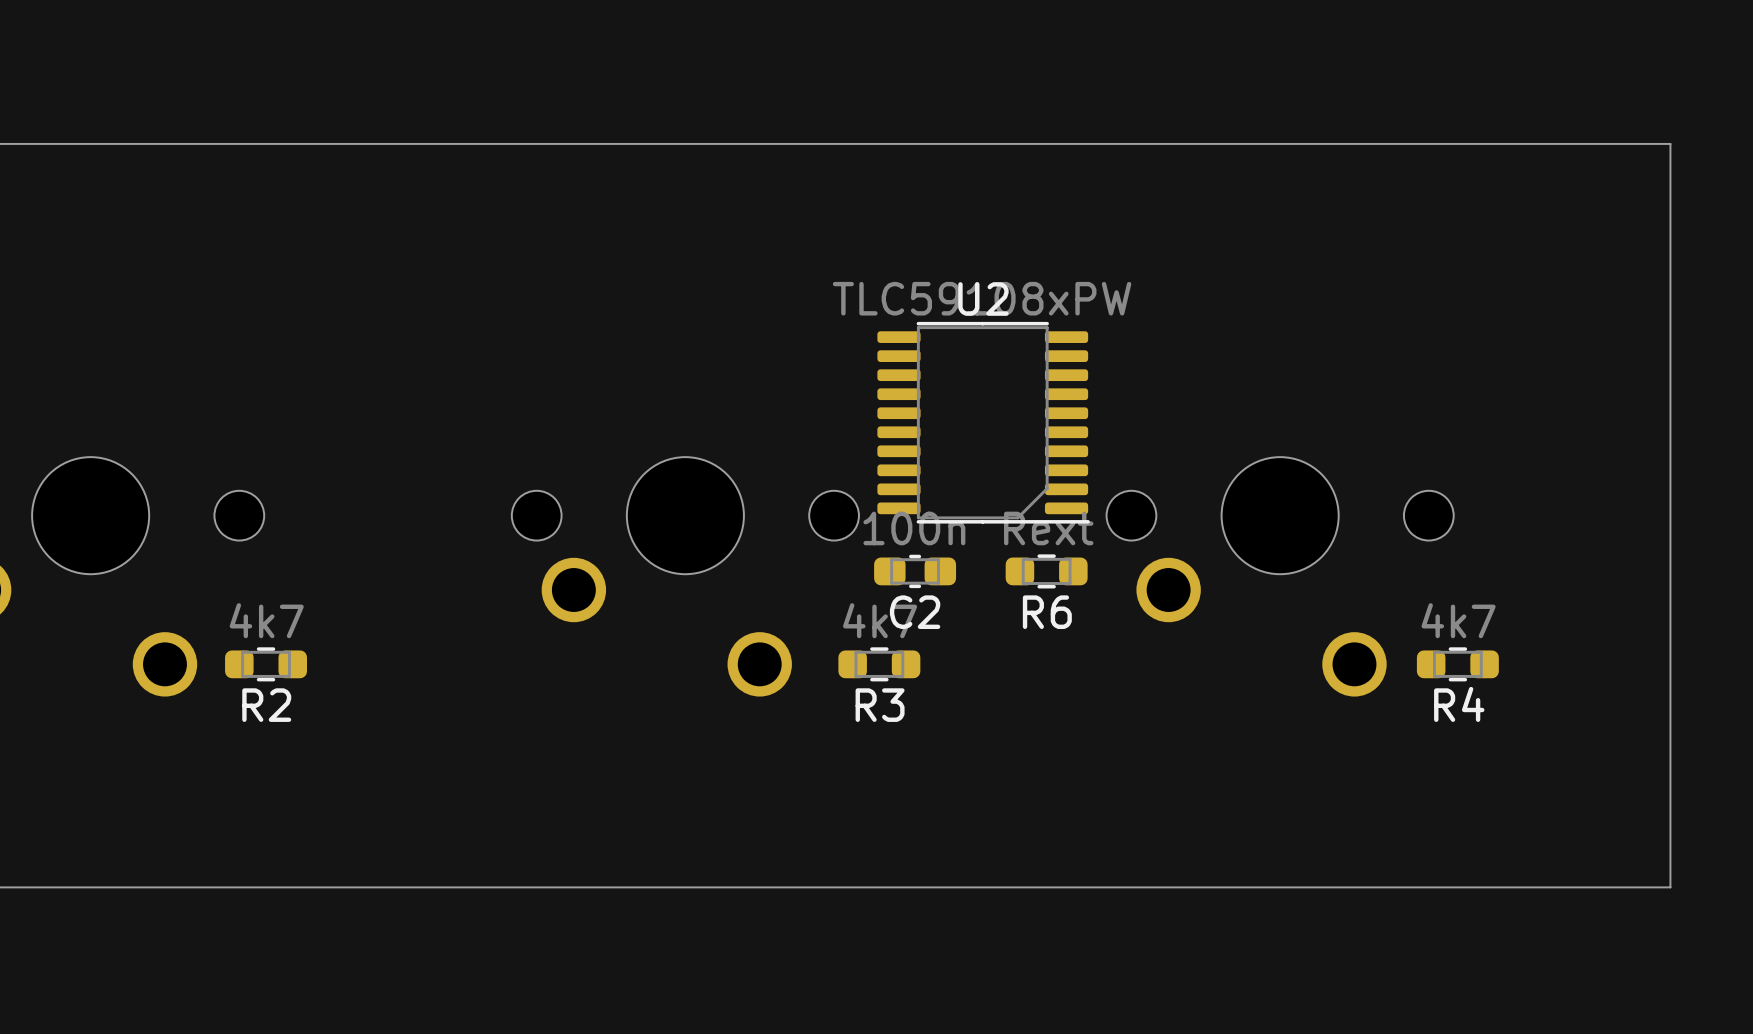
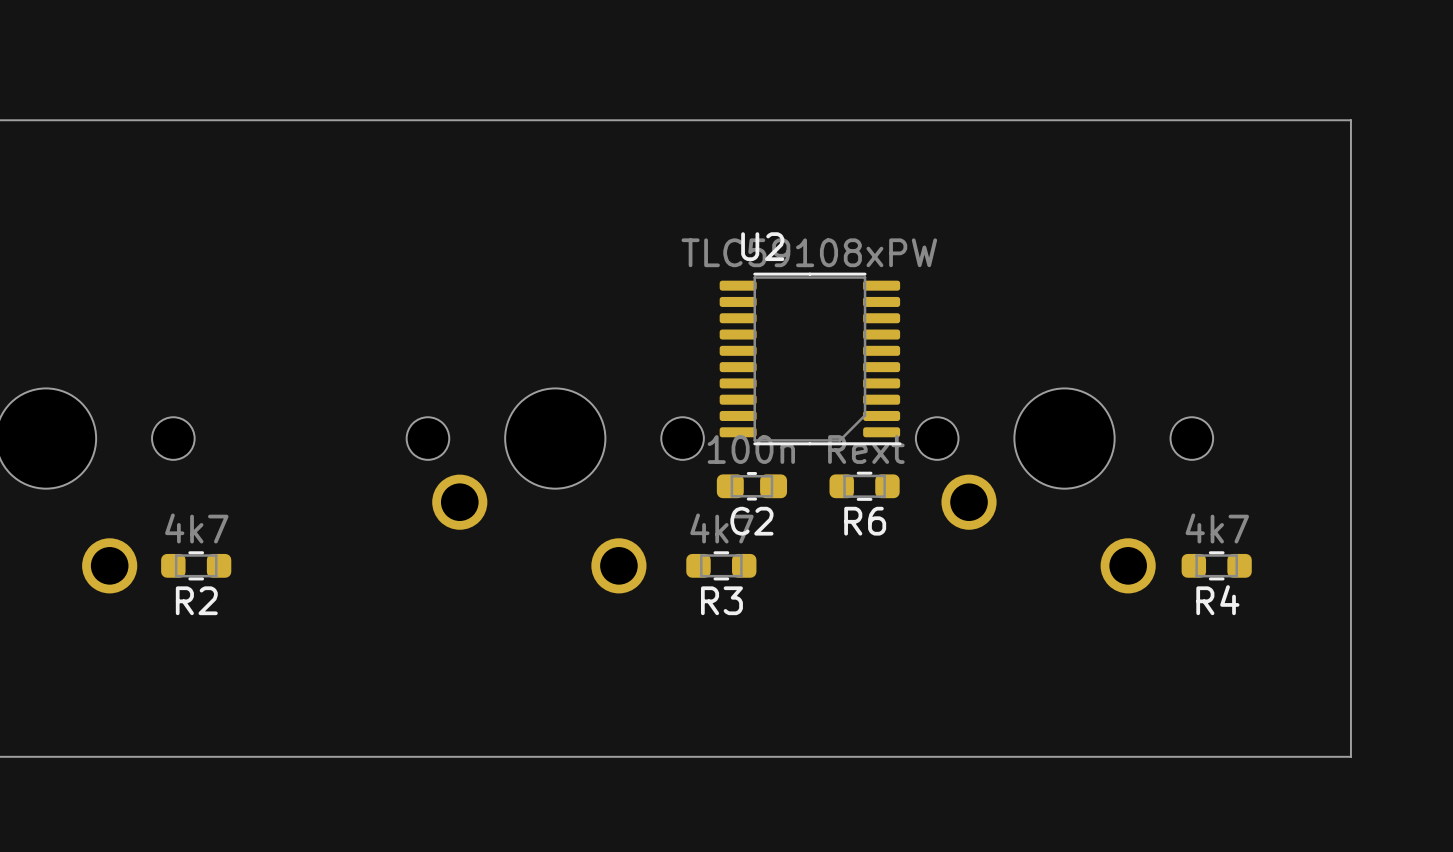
board edge: (1614, 143) (1670, 143) (1670, 887) (1614, 887) -> (1350, 120) (1350, 756)
U2 name position: U2 (983, 298) -> U2 (762, 246)

